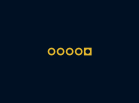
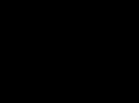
part: (69, 51) -> none

